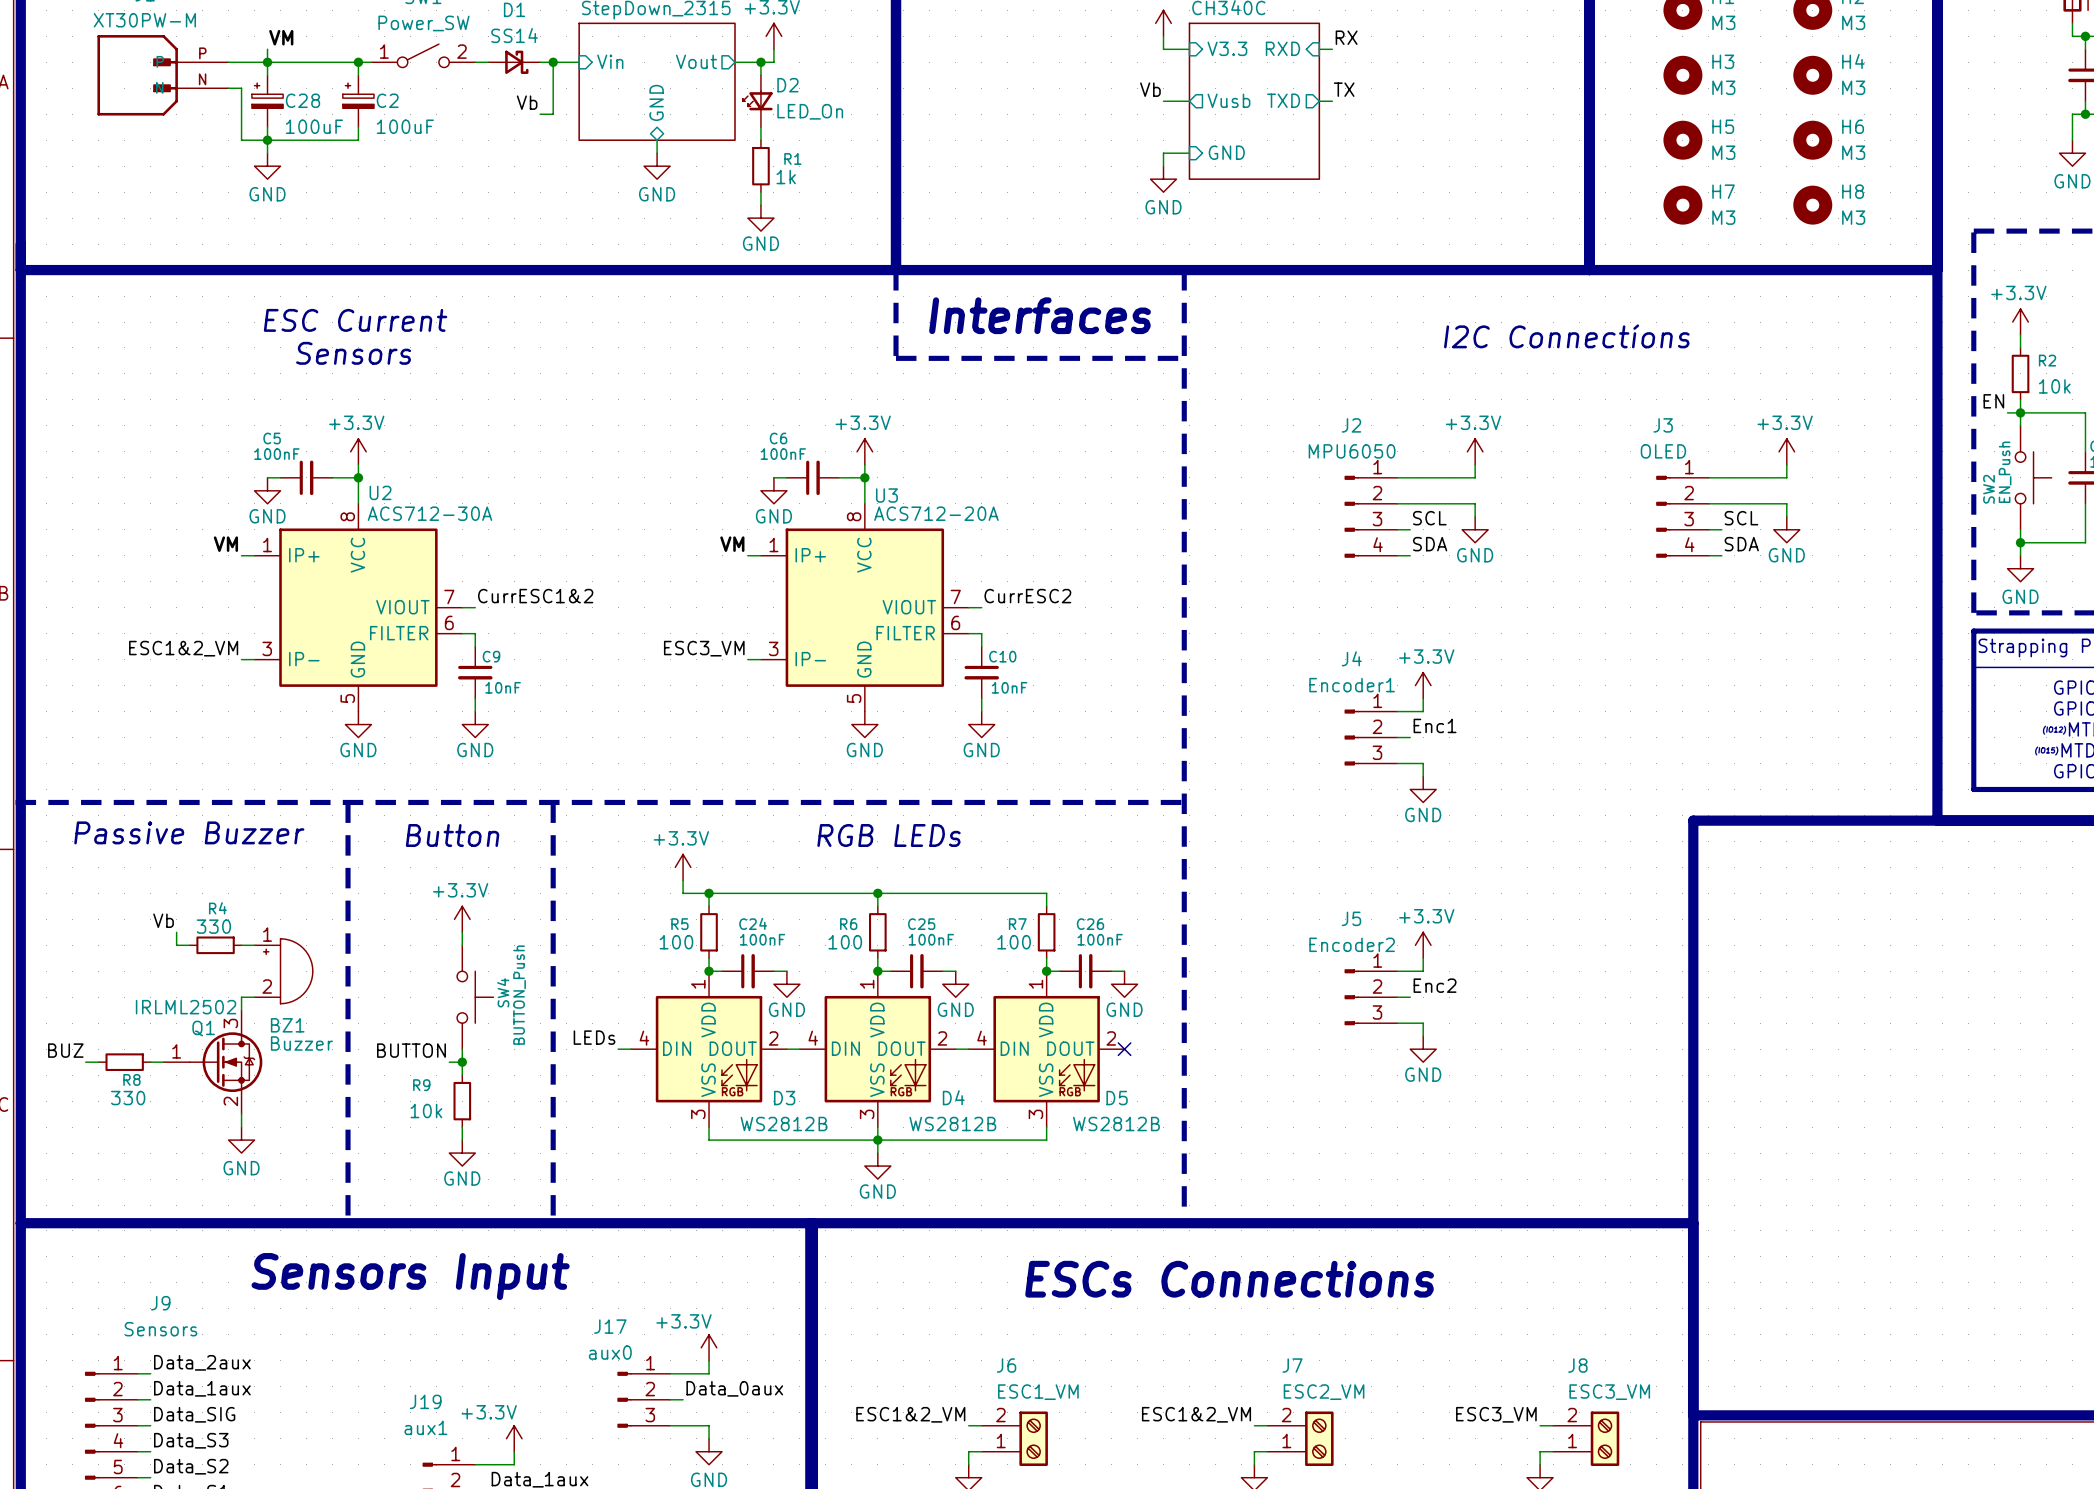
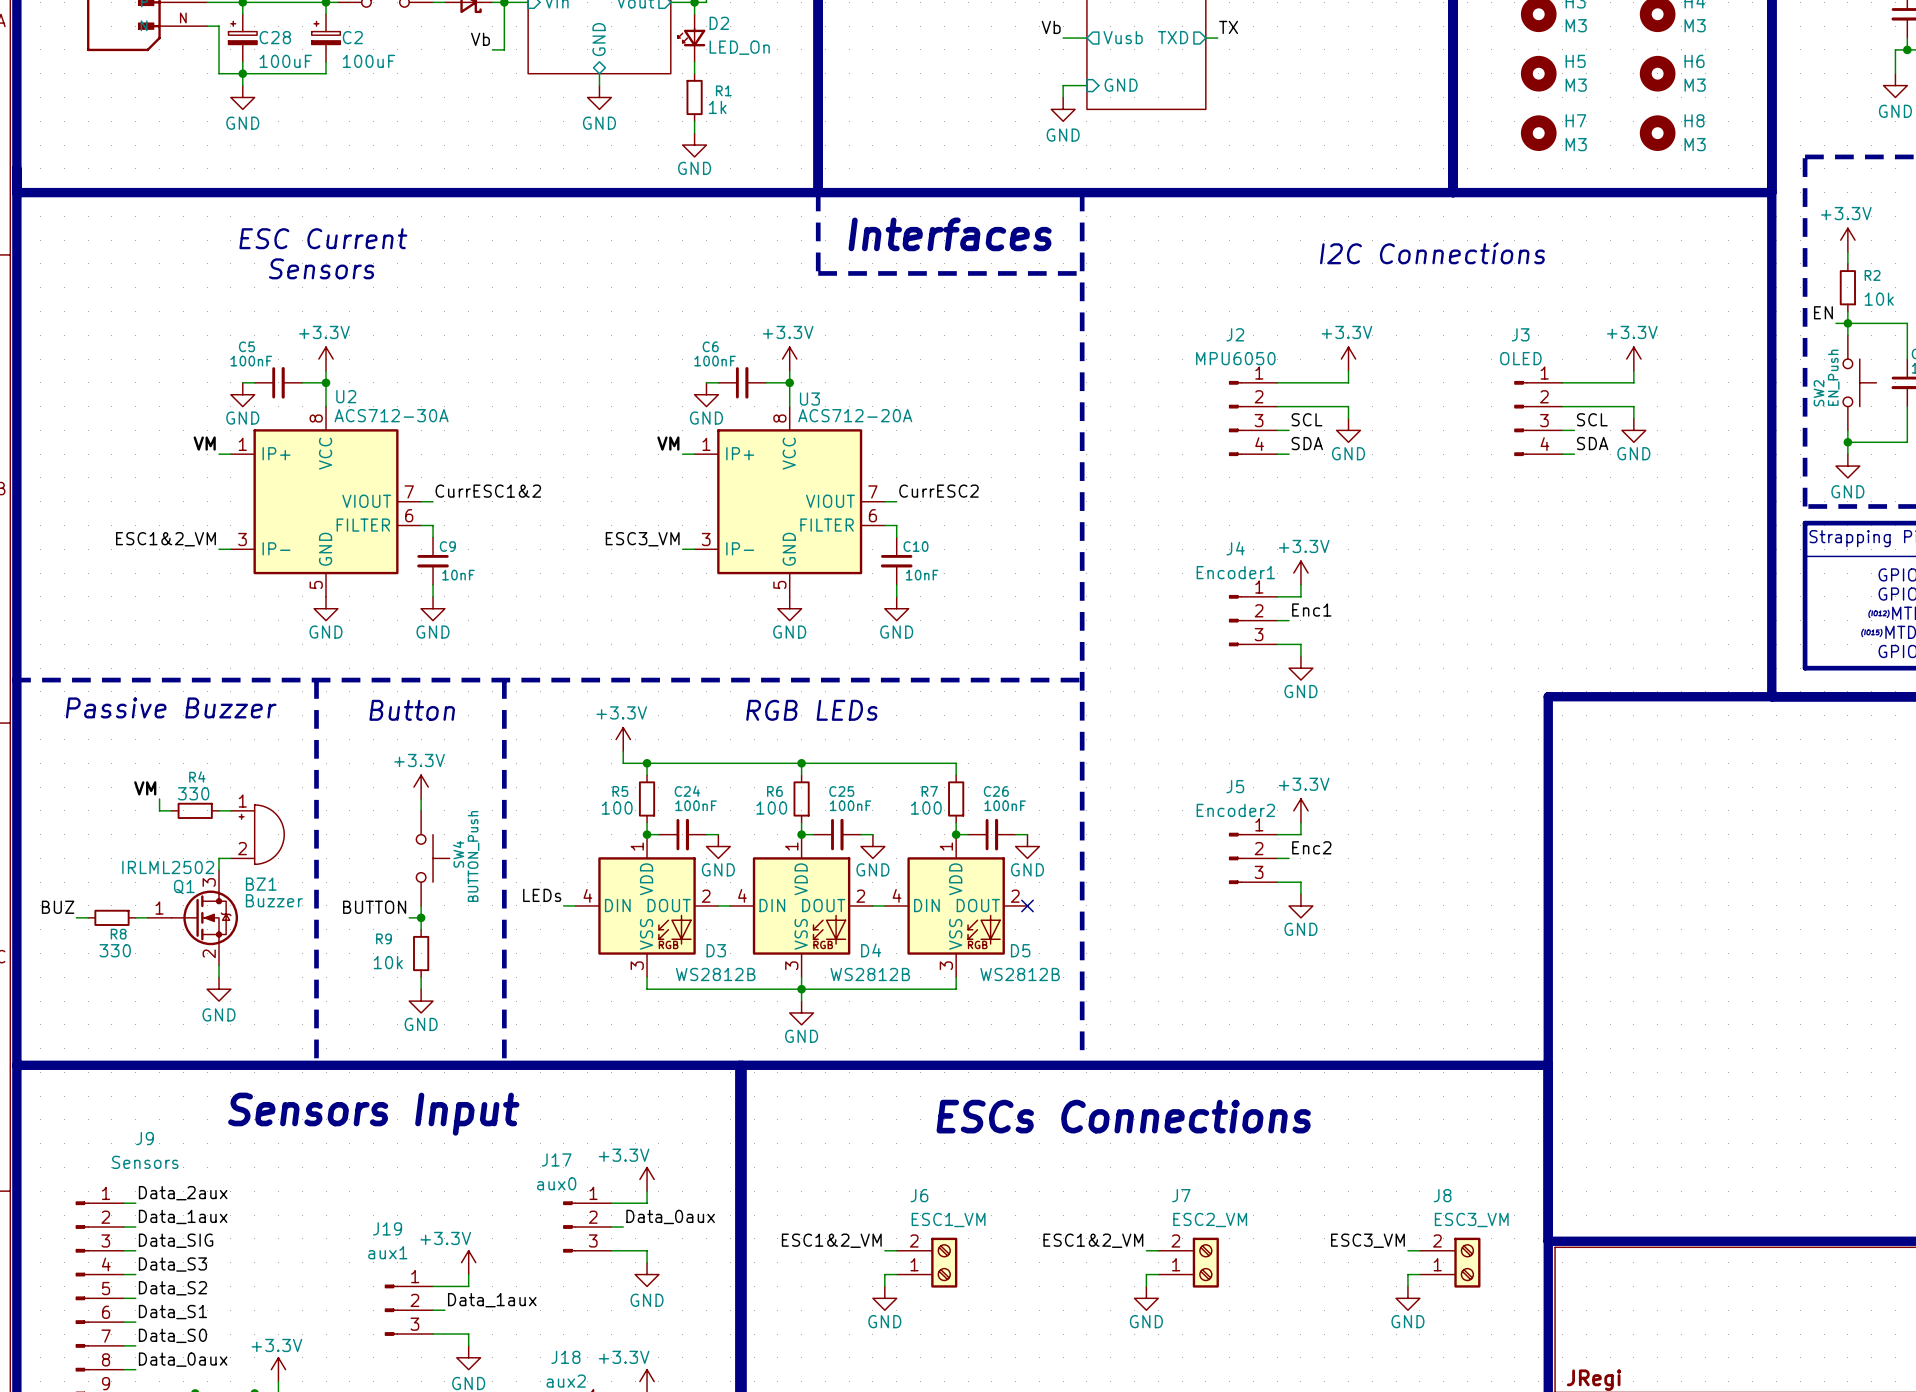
label: Vb (163, 920) -> VM (145, 788)

